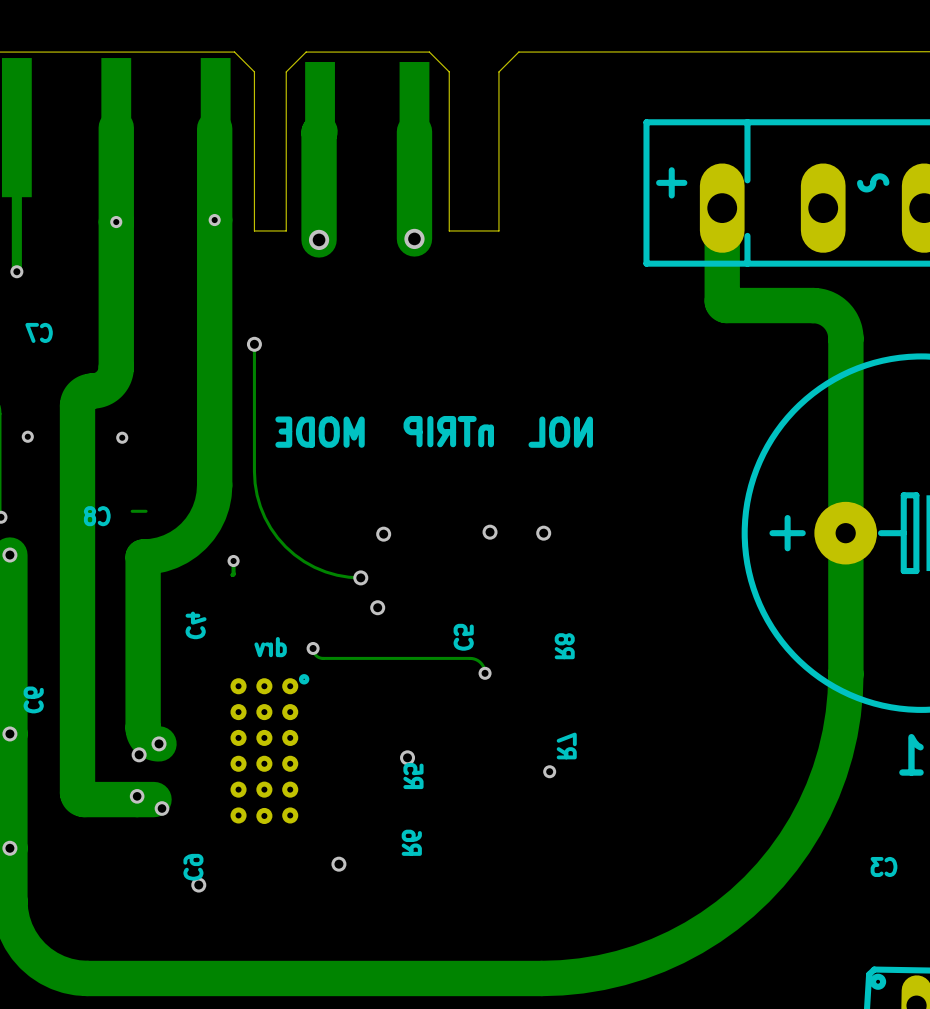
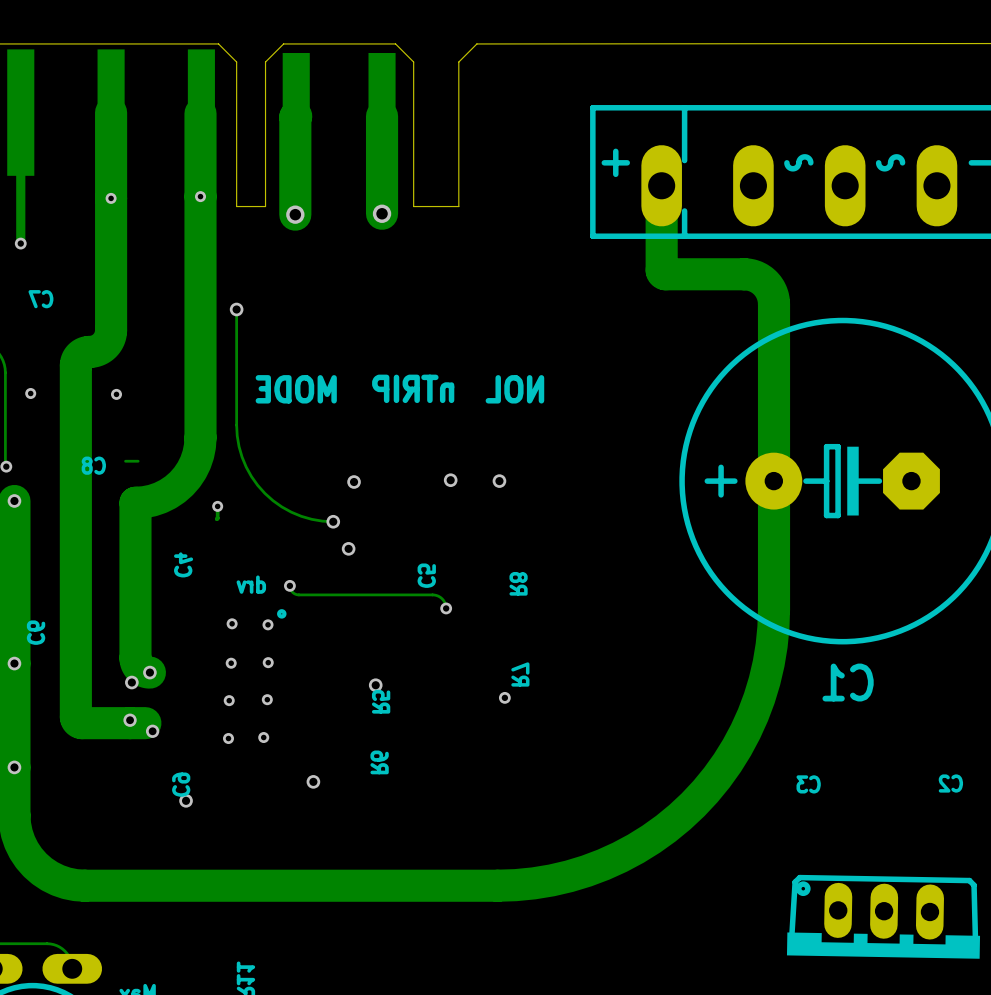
via: none -> (232, 623)
via: none -> (268, 624)
via: none -> (268, 662)
via: none -> (231, 663)
part: (264, 751) -> none
via: none -> (267, 699)
via: none -> (229, 700)
via: none -> (263, 737)
via: none -> (228, 738)

